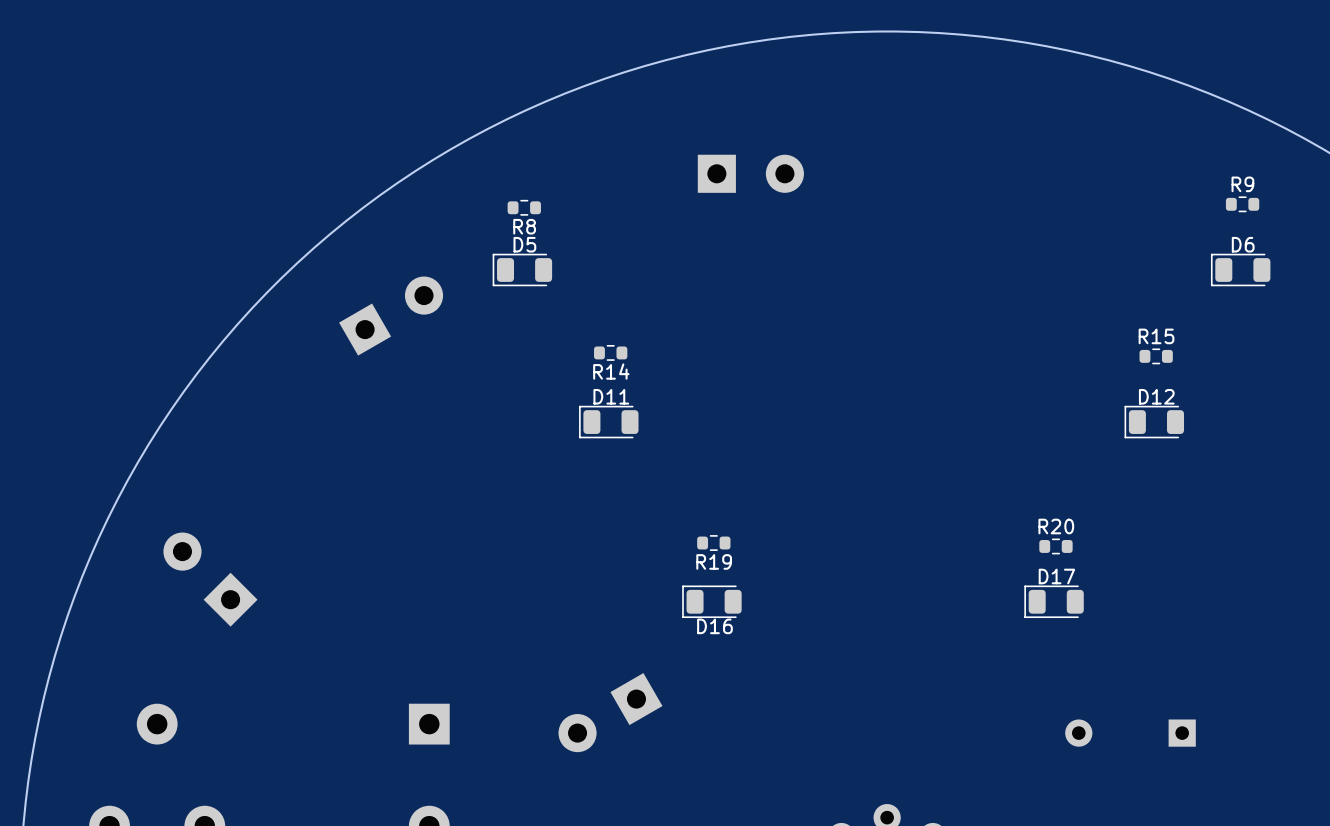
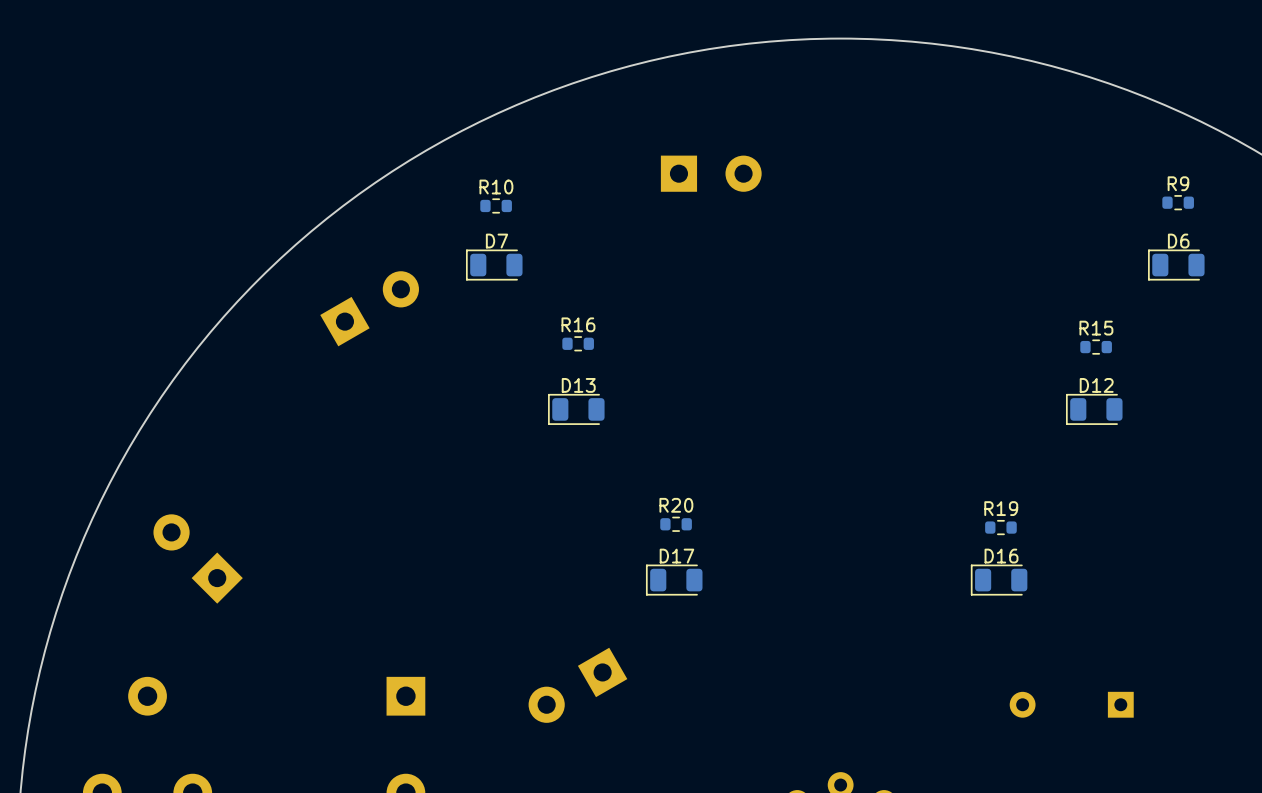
R8 name: R8 (524, 226) -> R10 (496, 187)
D5 name: D5 (524, 244) -> D7 (496, 241)
R14 name: R14 (611, 371) -> R16 (578, 324)
D11 name: D11 (611, 396) -> D13 (578, 385)
R20 name: R20 (1056, 526) -> R19 (1001, 508)
R19 name: R19 (714, 561) -> R20 (676, 505)
D17 name: D17 (1056, 576) -> D16 (1001, 556)
D16 name: D16 (714, 626) -> D17 (676, 556)

